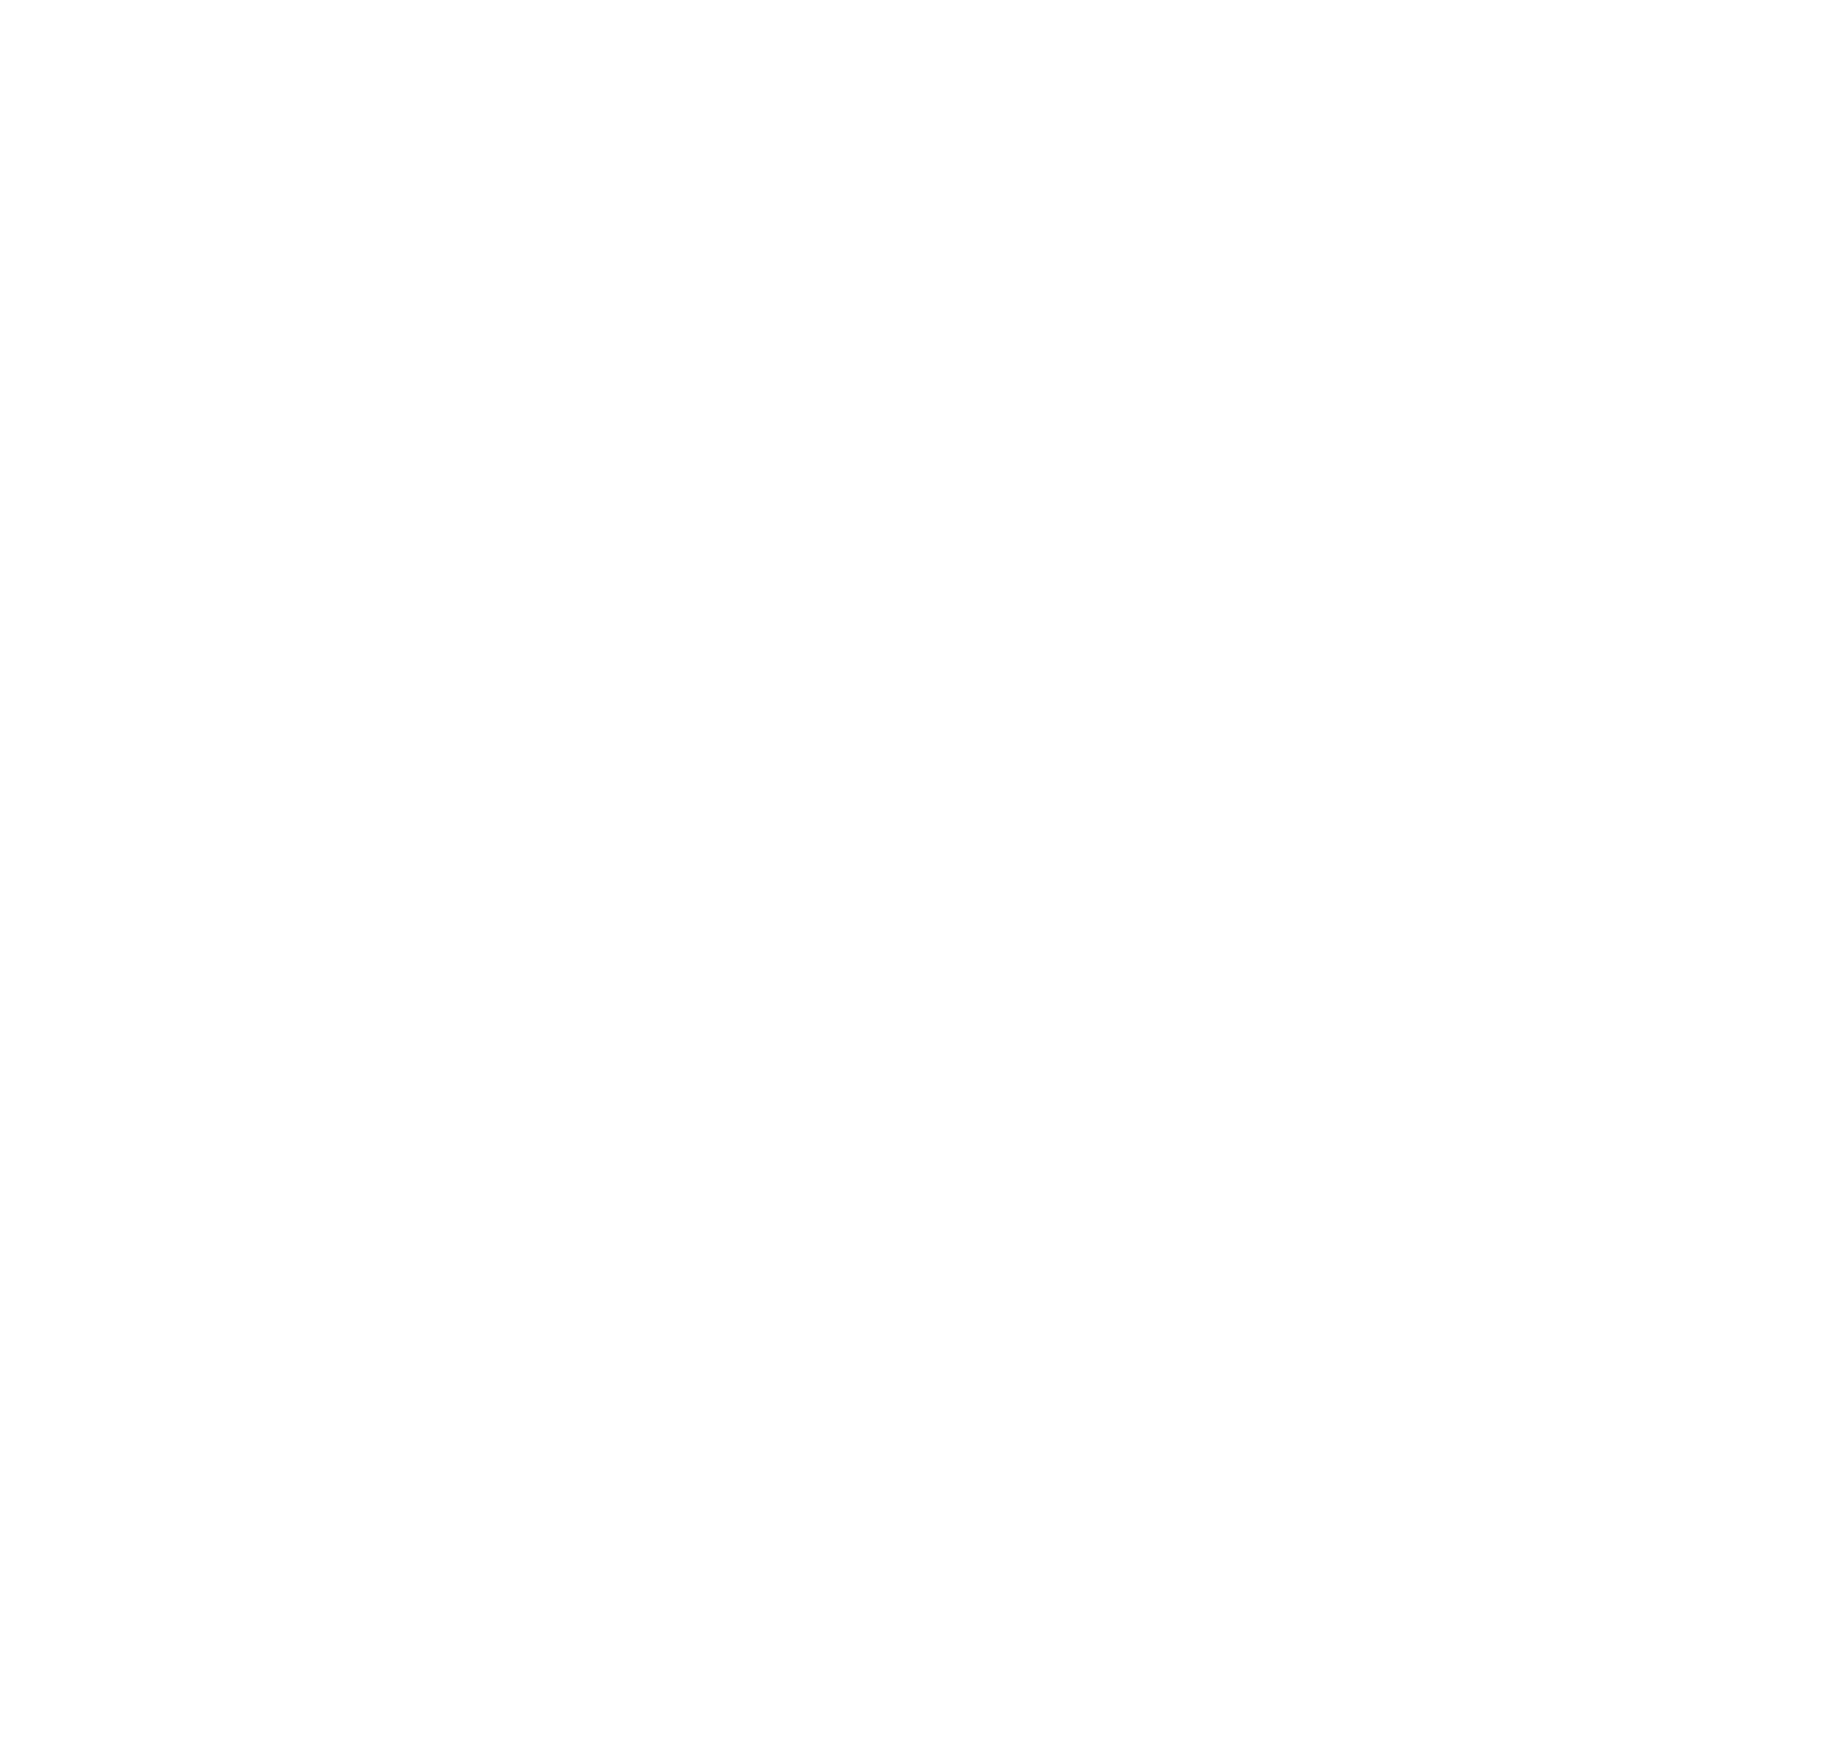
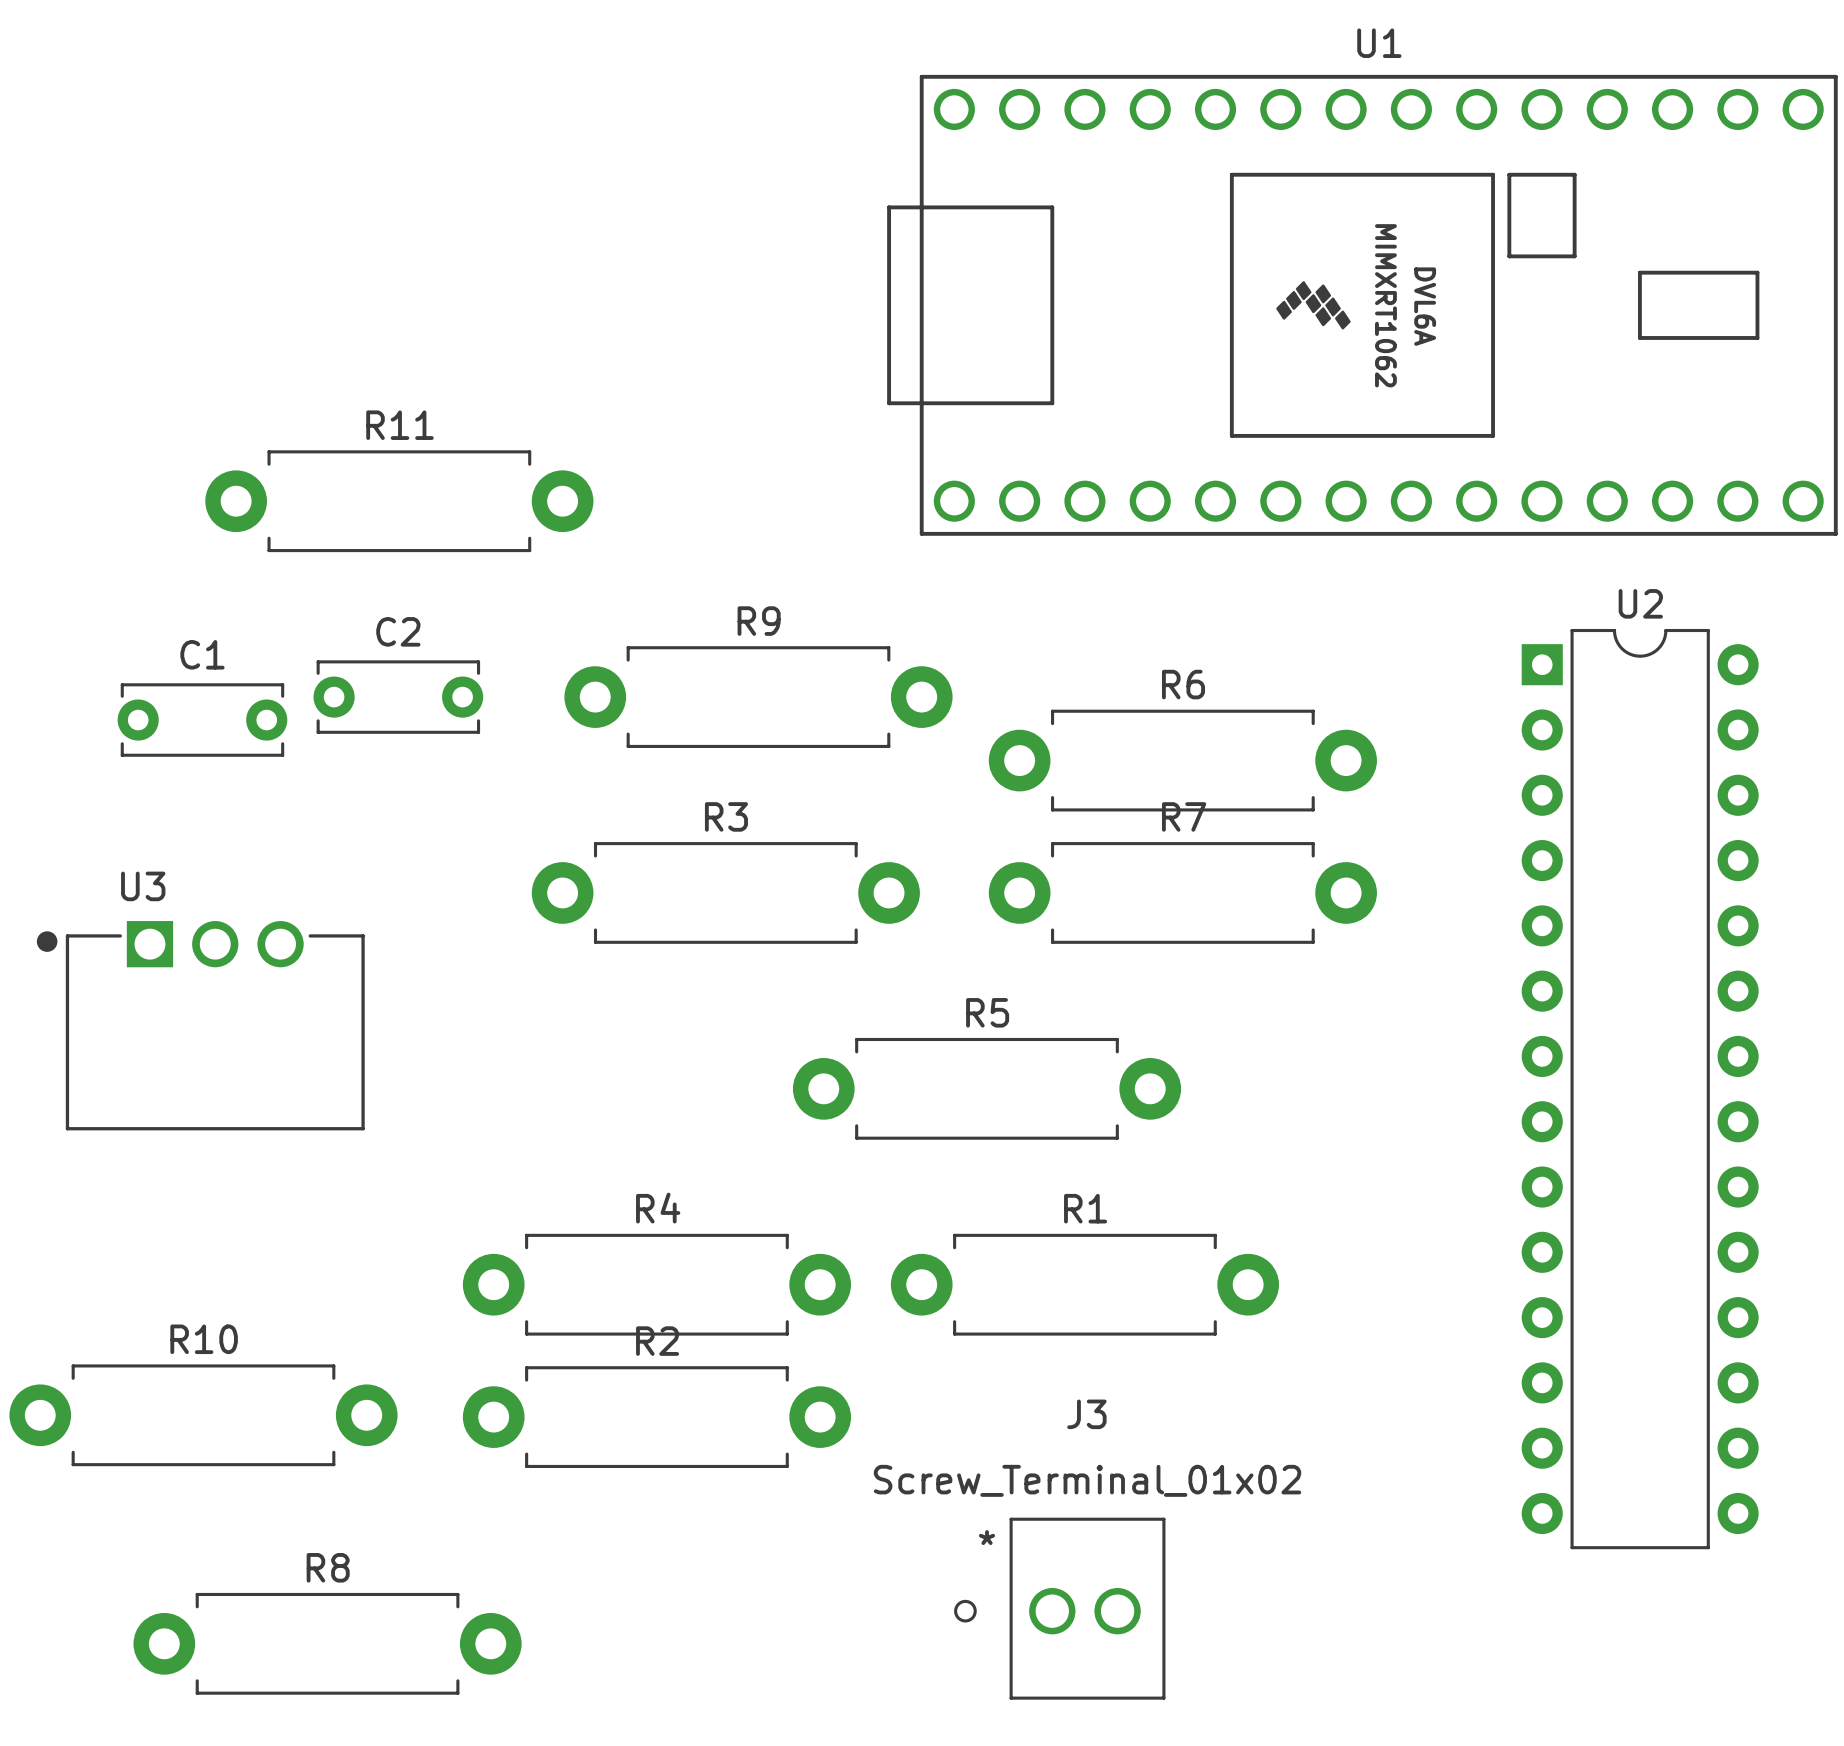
U1: none -> (1362, 305)
R11: none -> (399, 501)
C2: none -> (398, 697)
R9: none -> (758, 697)
C1: none -> (202, 720)
R6: none -> (1182, 760)
R3: none -> (725, 892)
R7: none -> (1182, 892)
U3: none -> (200, 1025)
R5: none -> (987, 1088)
U2: none -> (1640, 1089)
R4: none -> (656, 1284)
R1: none -> (1084, 1284)
R10: none -> (203, 1415)
R2: none -> (656, 1417)
J3: none -> Screw_Terminal_01x02 (1059, 1608)
R8: none -> (327, 1643)

